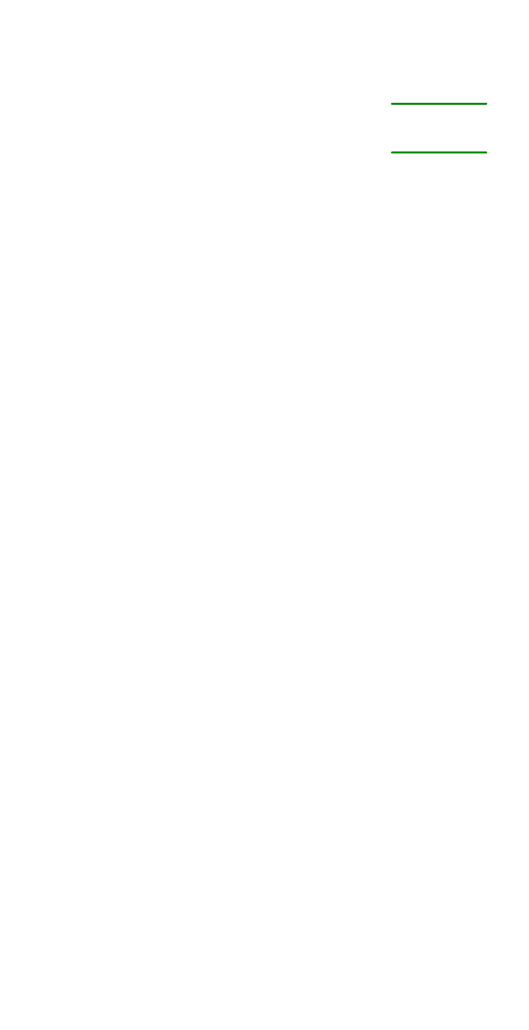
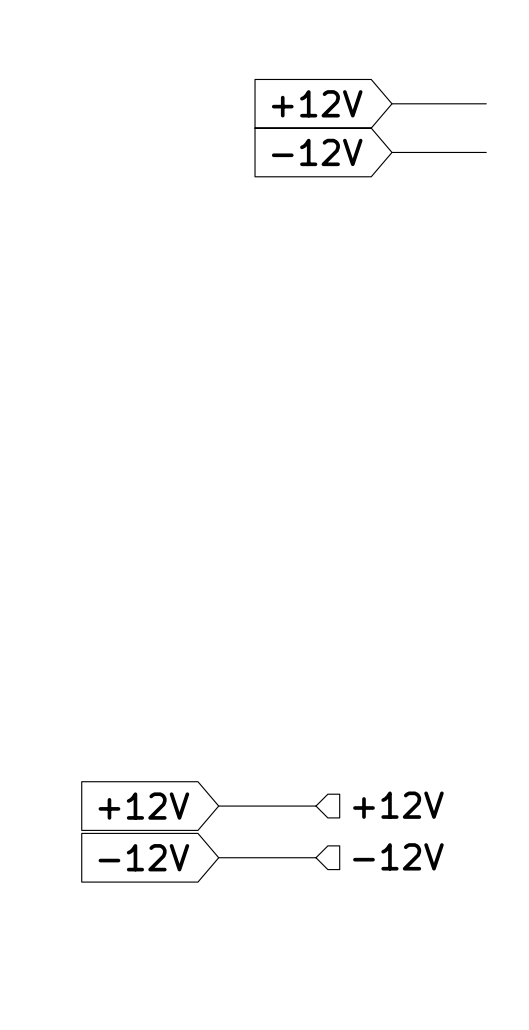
global label: none -> +12V (317, 103)
global label: none -> -12V (317, 152)
sheet pin: none -> +12V (398, 805)
global label: none -> +12V (143, 806)
wire: none -> (218, 806) (315, 806)
sheet pin: none -> -12V (398, 856)
global label: none -> -12V (143, 857)
wire: none -> (218, 857) (315, 857)

